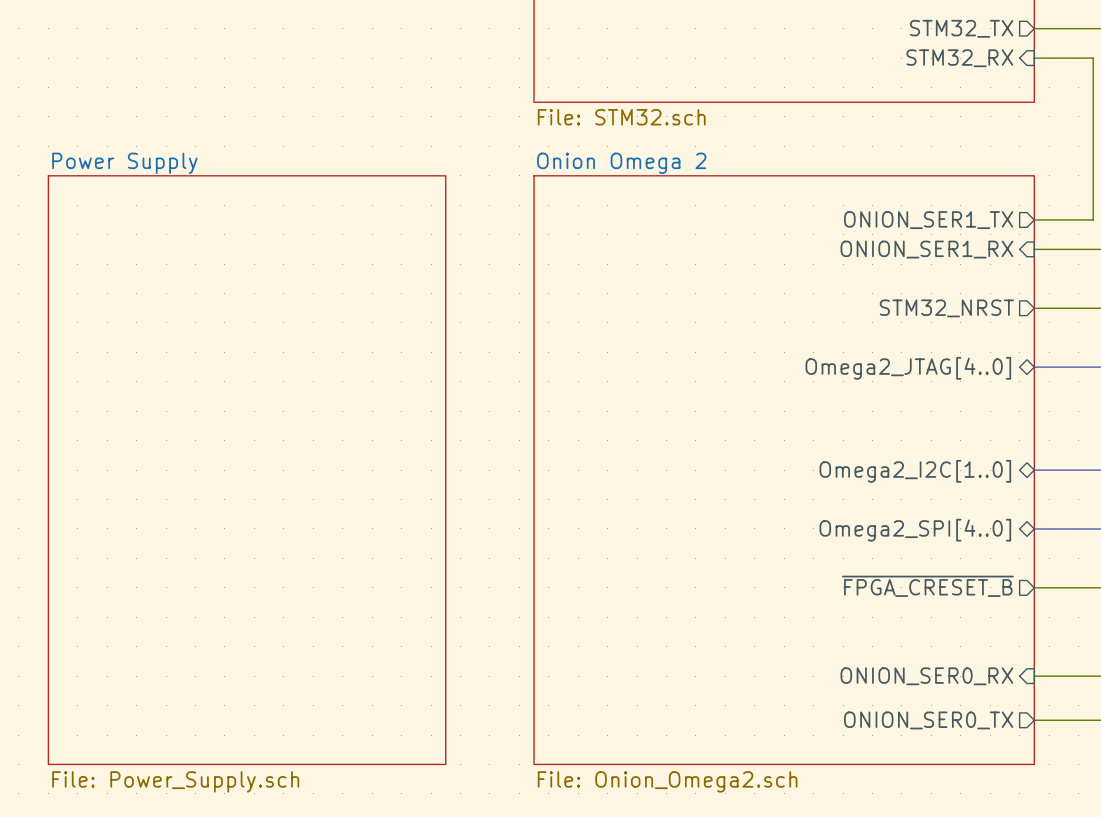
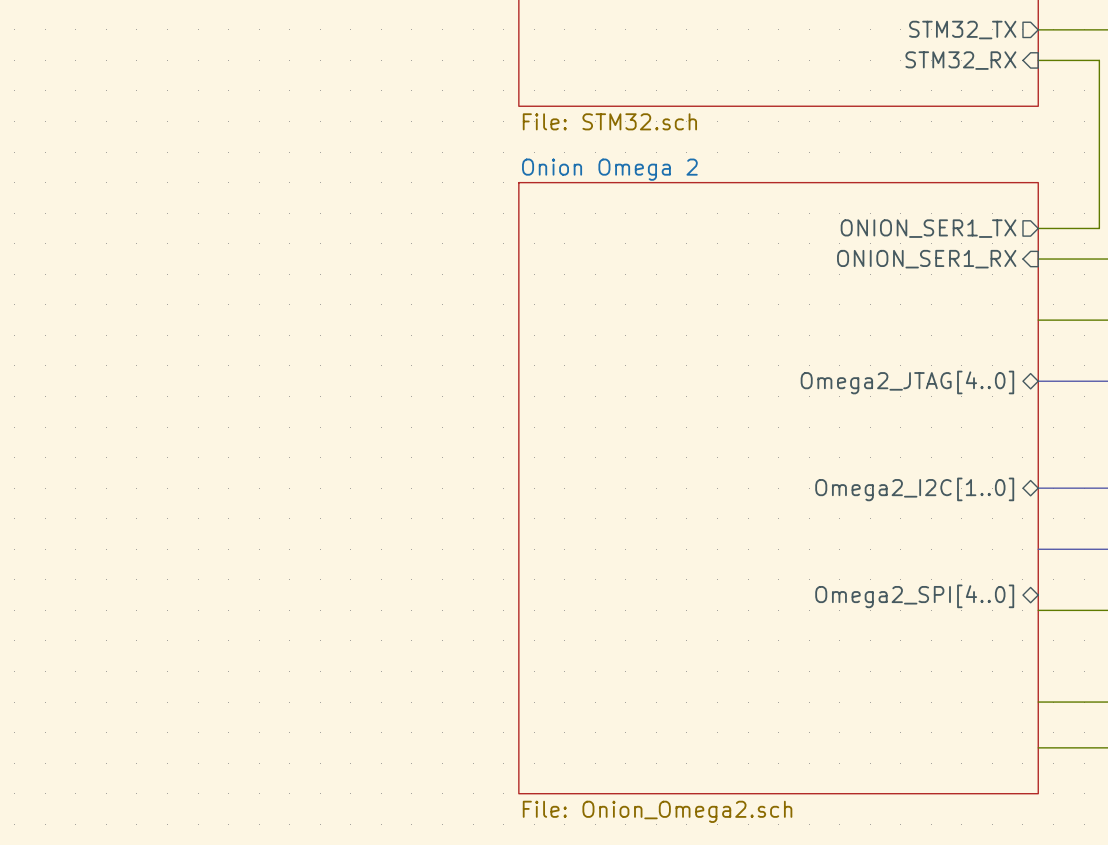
sheet pin: STM32_NRST (946, 308) -> none
sheet Power Supply: File: Power_Supply.sch (247, 470) -> none
sheet pin position: Omega2_SPI[4..0] (915, 530) -> Omega2_SPI[4..0] (914, 596)
sheet pin: ~{FPGA_CRESET_B} (927, 586) -> none
sheet pin: ONION_SER0_RX (926, 676) -> none
sheet pin: ONION_SER0_TX (928, 720) -> none

